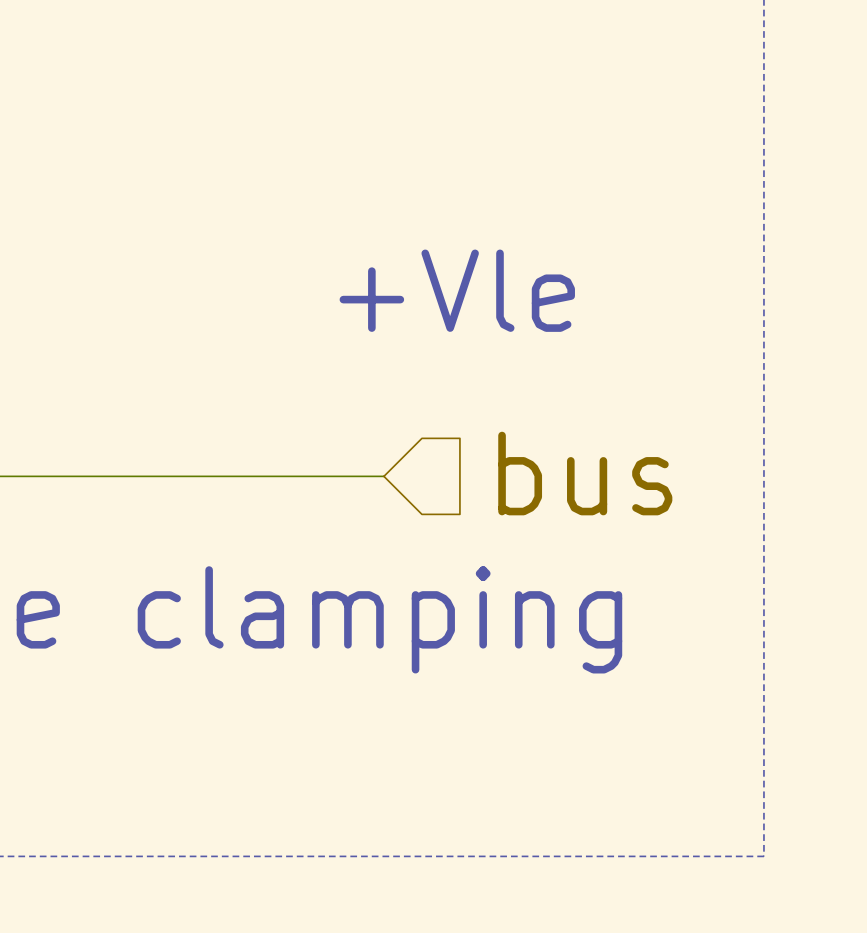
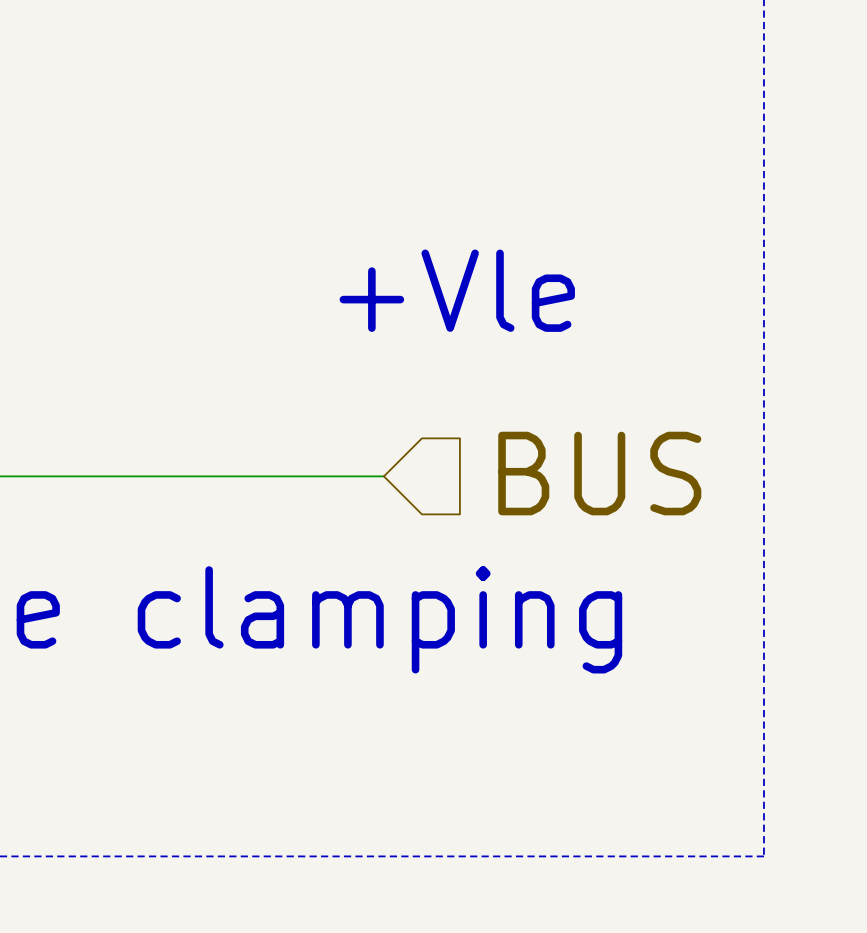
hierarchical label: bus (585, 473) -> BUS (599, 473)

